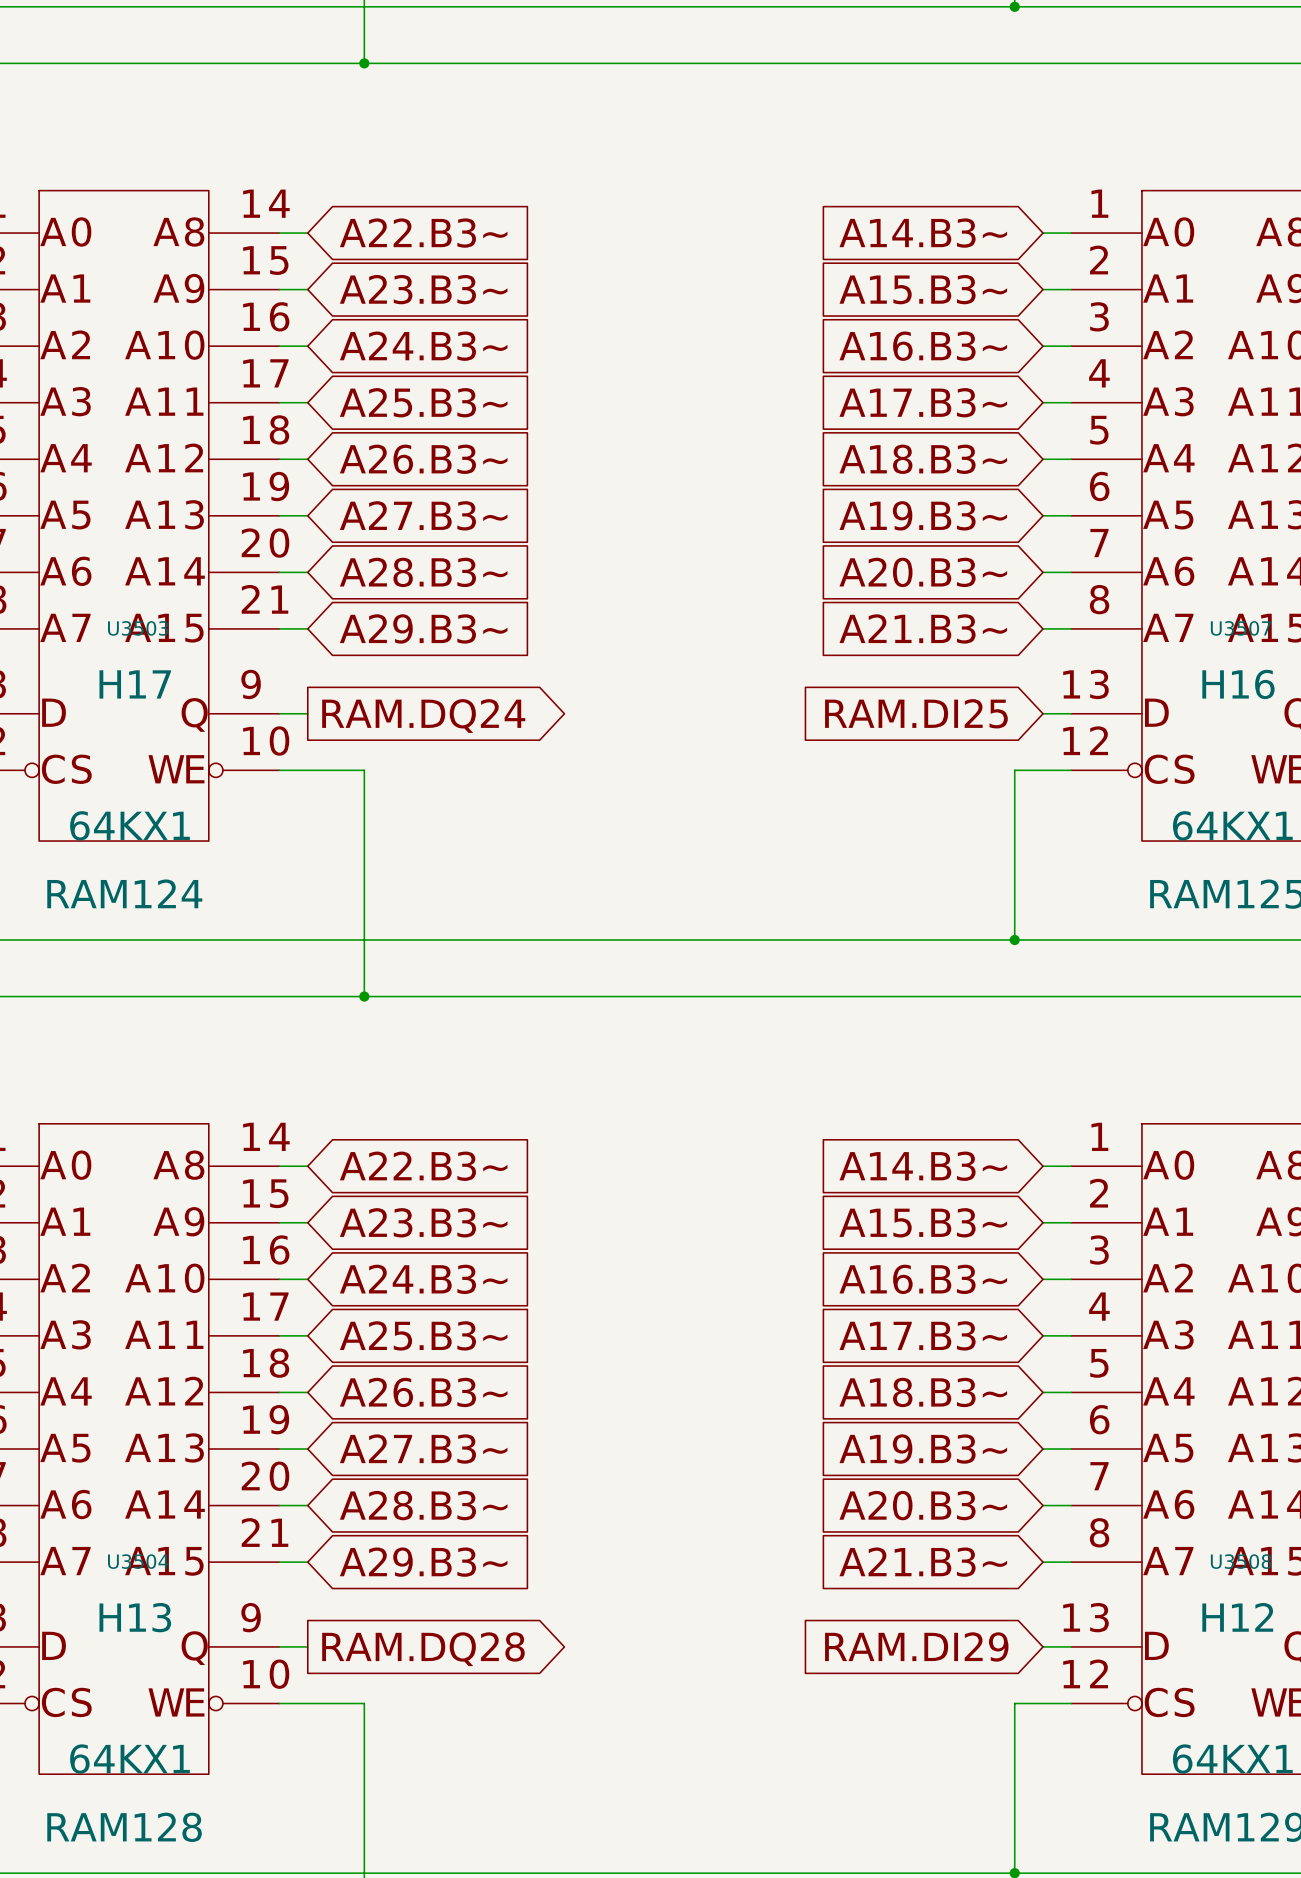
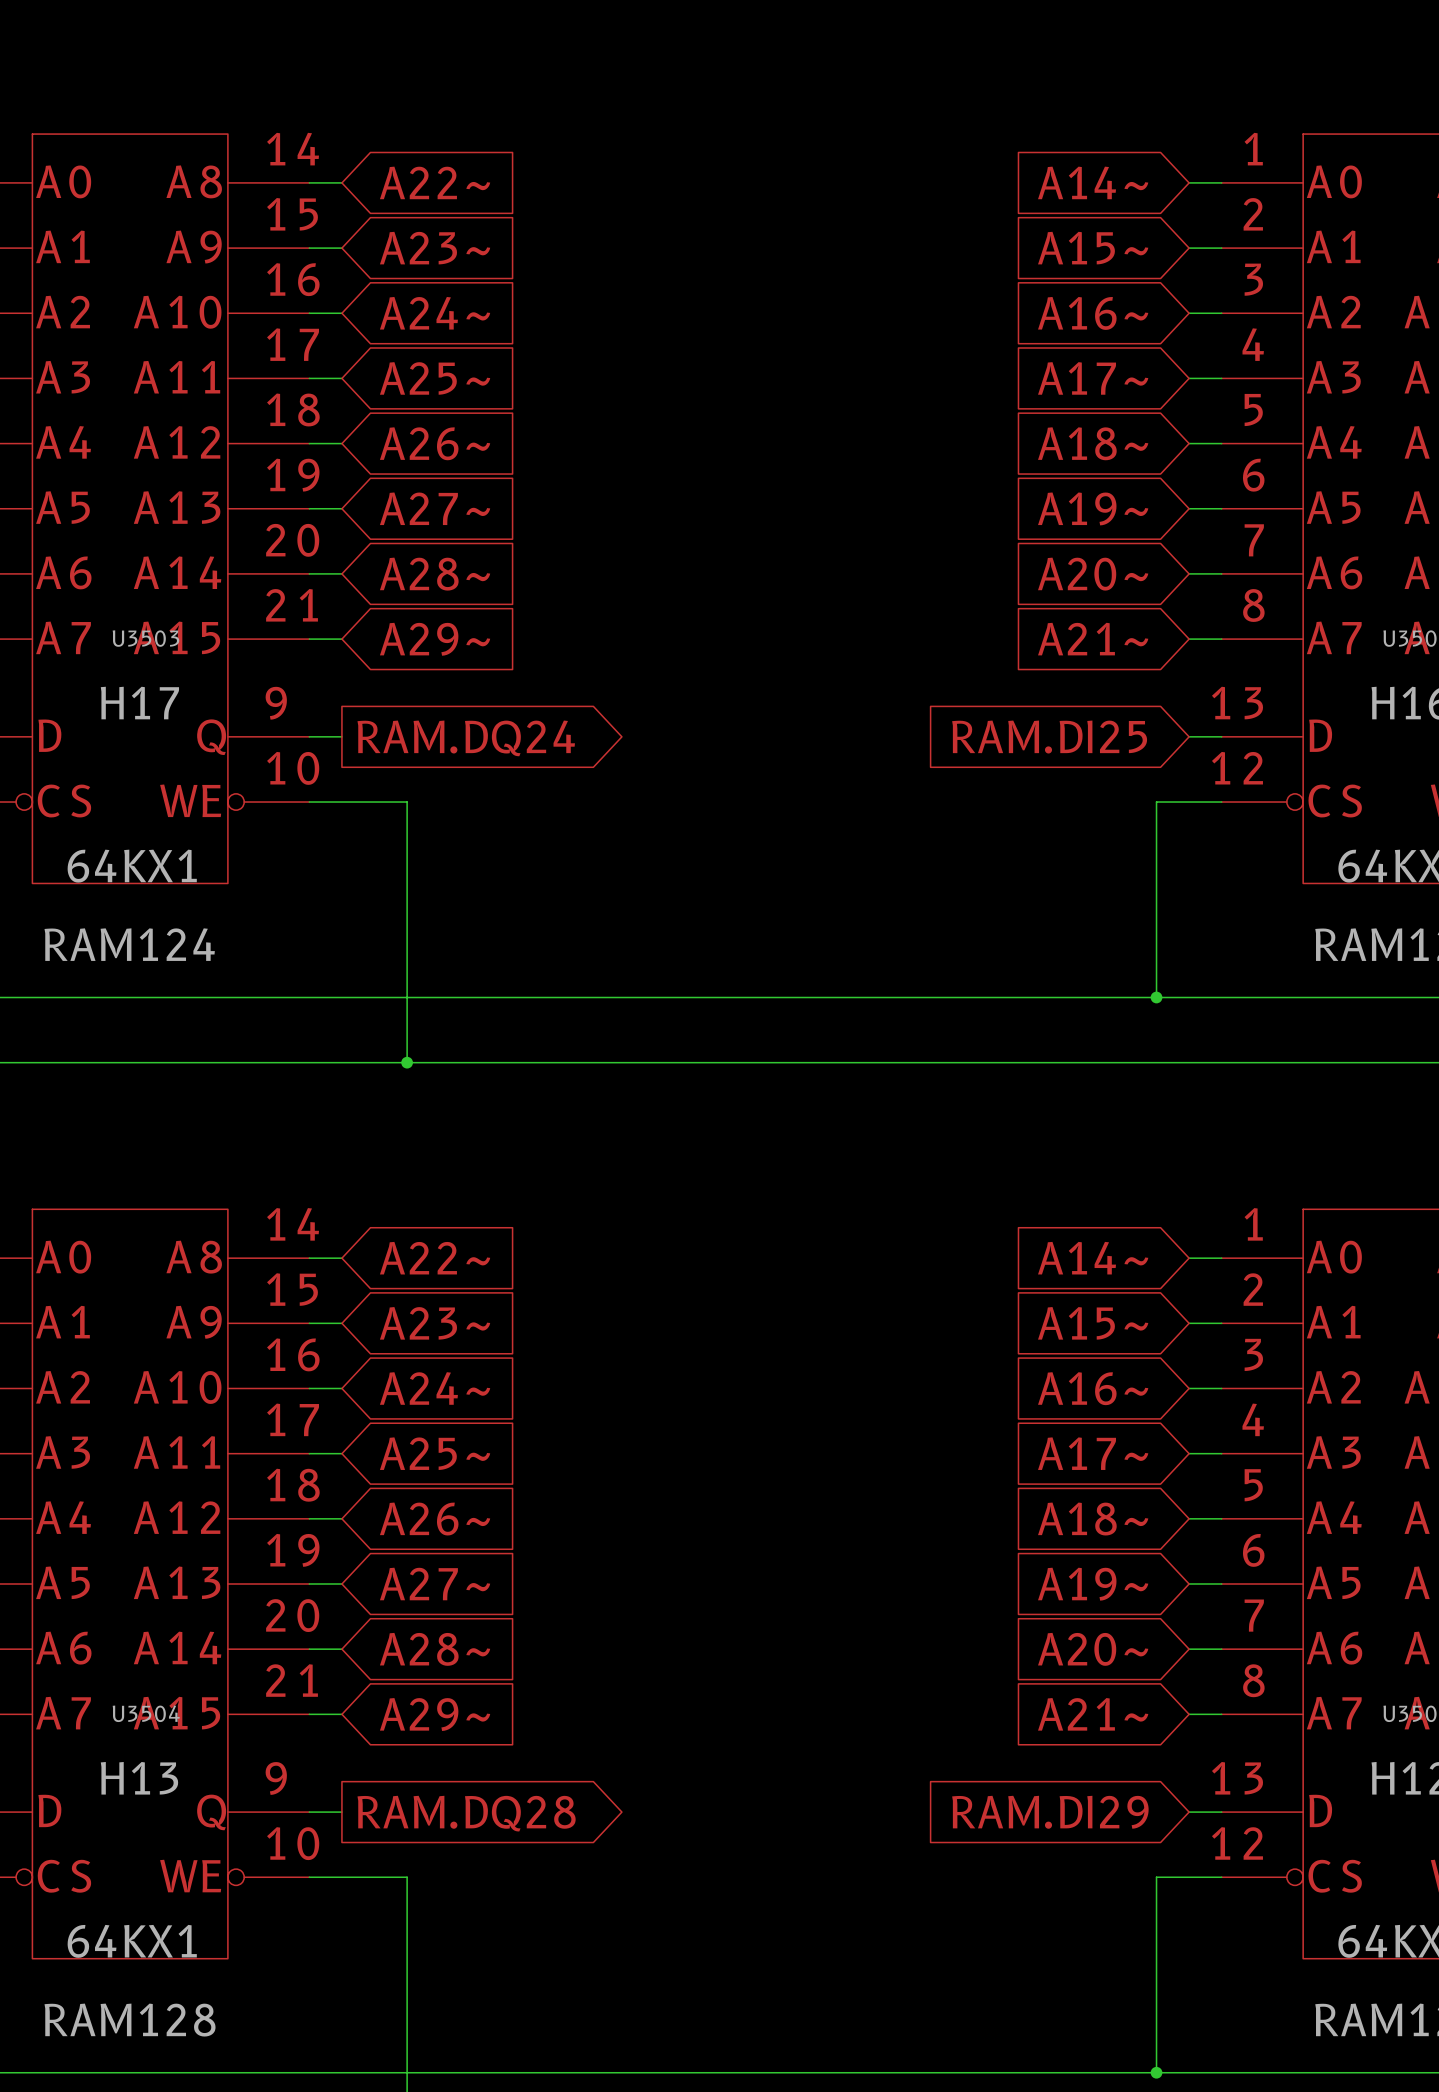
global label: A22.B3~ (423, 233) -> A22~ (435, 182)
global label: A14.B3~ (923, 233) -> A14~ (1093, 182)
global label: A23.B3~ (423, 289) -> A23~ (435, 248)
global label: A15.B3~ (923, 289) -> A15~ (1093, 248)
global label: A24.B3~ (423, 346) -> A24~ (435, 313)
global label: A16.B3~ (923, 346) -> A16~ (1093, 313)
global label: A25.B3~ (423, 402) -> A25~ (435, 378)
global label: A17.B3~ (923, 402) -> A17~ (1093, 378)
global label: A26.B3~ (423, 459) -> A26~ (435, 443)
global label: A18.B3~ (923, 459) -> A18~ (1093, 443)
global label: A27.B3~ (423, 515) -> A27~ (435, 508)
global label: A19.B3~ (923, 515) -> A19~ (1093, 508)
global label: A28.B3~ (423, 572) -> A28~ (435, 574)
global label: A20.B3~ (923, 572) -> A20~ (1093, 574)
global label: A29.B3~ (423, 628) -> A29~ (435, 639)
global label: A21.B3~ (923, 628) -> A21~ (1093, 639)
global label: A22.B3~ (423, 1166) -> A22~ (435, 1258)
global label: A14.B3~ (923, 1166) -> A14~ (1093, 1258)
global label: A23.B3~ (423, 1222) -> A23~ (435, 1323)
global label: A15.B3~ (923, 1222) -> A15~ (1093, 1323)
global label: A24.B3~ (423, 1279) -> A24~ (435, 1388)
global label: A16.B3~ (923, 1279) -> A16~ (1093, 1388)
global label: A25.B3~ (423, 1335) -> A25~ (435, 1453)
global label: A17.B3~ (923, 1335) -> A17~ (1093, 1453)
global label: A26.B3~ (423, 1392) -> A26~ (435, 1519)
global label: A18.B3~ (923, 1392) -> A18~ (1093, 1519)
global label: A27.B3~ (423, 1449) -> A27~ (435, 1584)
global label: A19.B3~ (923, 1449) -> A19~ (1093, 1584)
global label: A28.B3~ (423, 1505) -> A28~ (435, 1649)
global label: A20.B3~ (923, 1505) -> A20~ (1093, 1649)
global label: A29.B3~ (423, 1562) -> A29~ (435, 1714)
global label: A21.B3~ (923, 1562) -> A21~ (1093, 1714)

